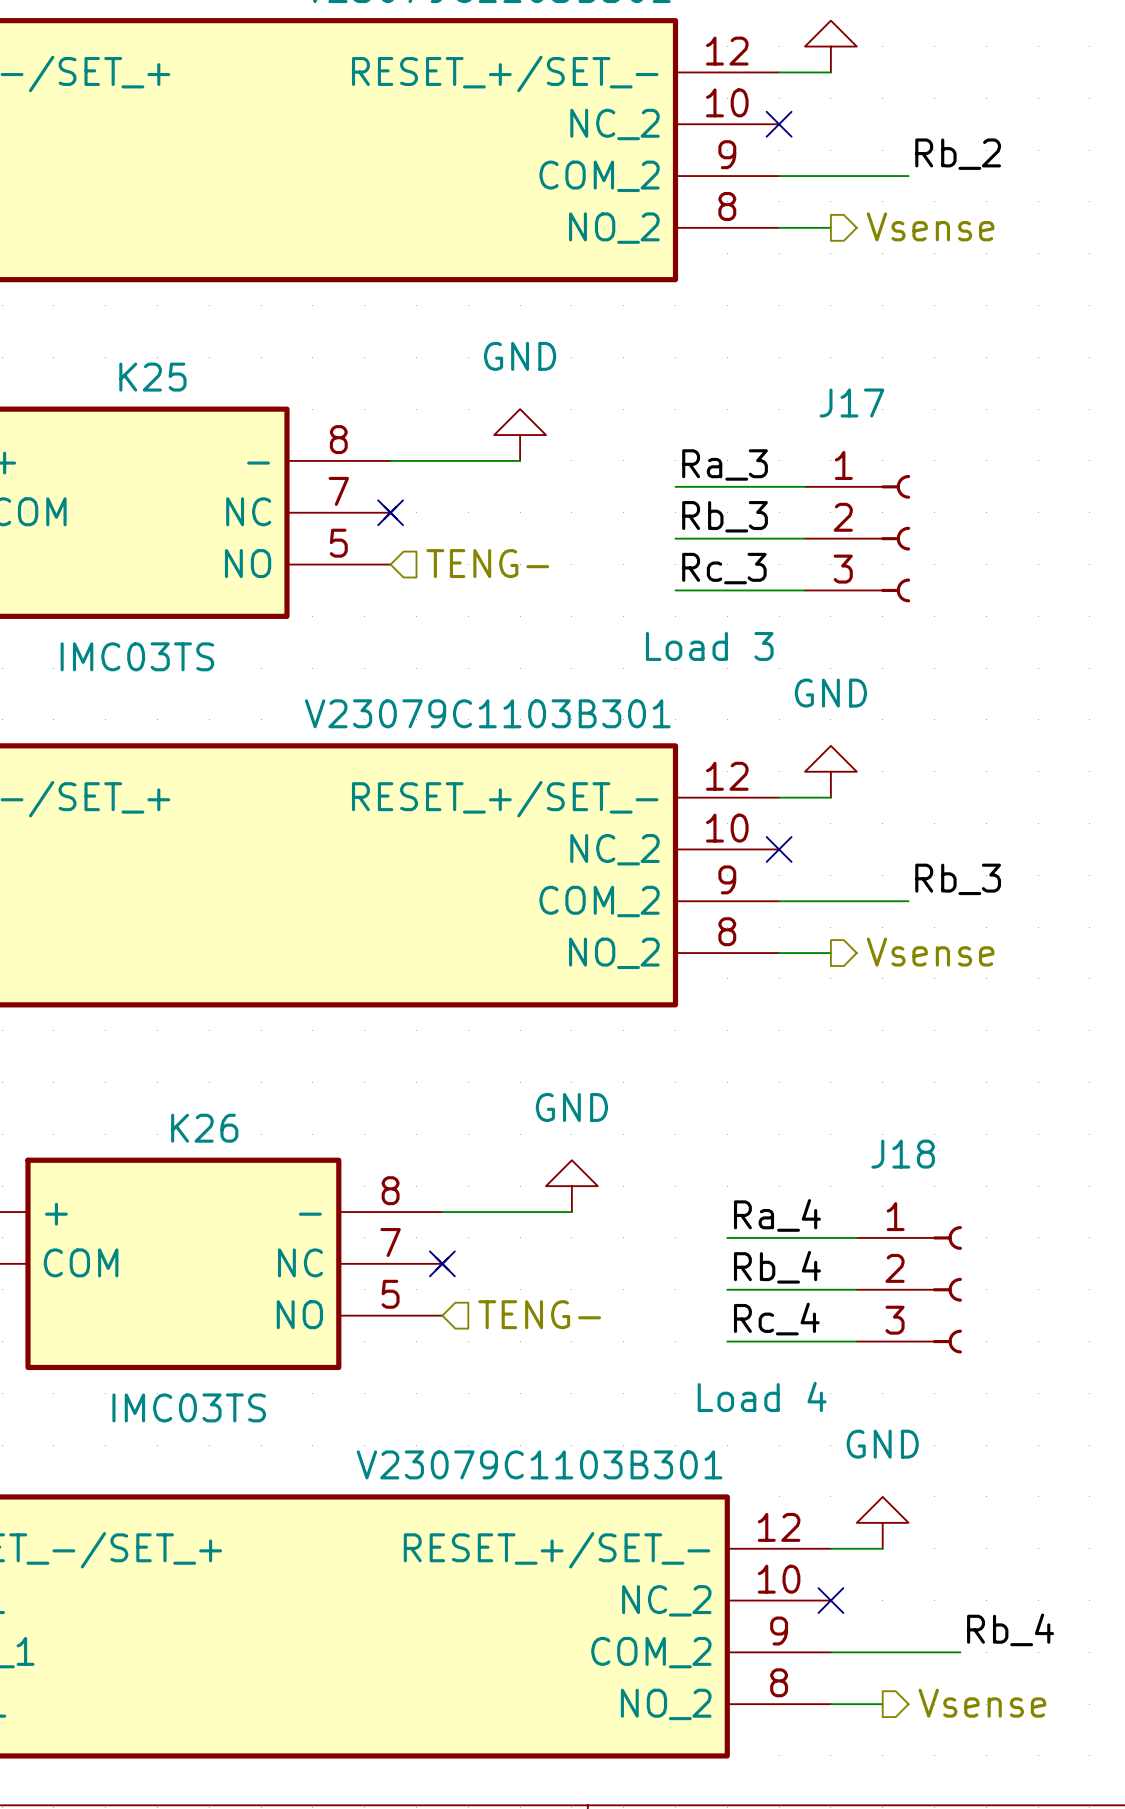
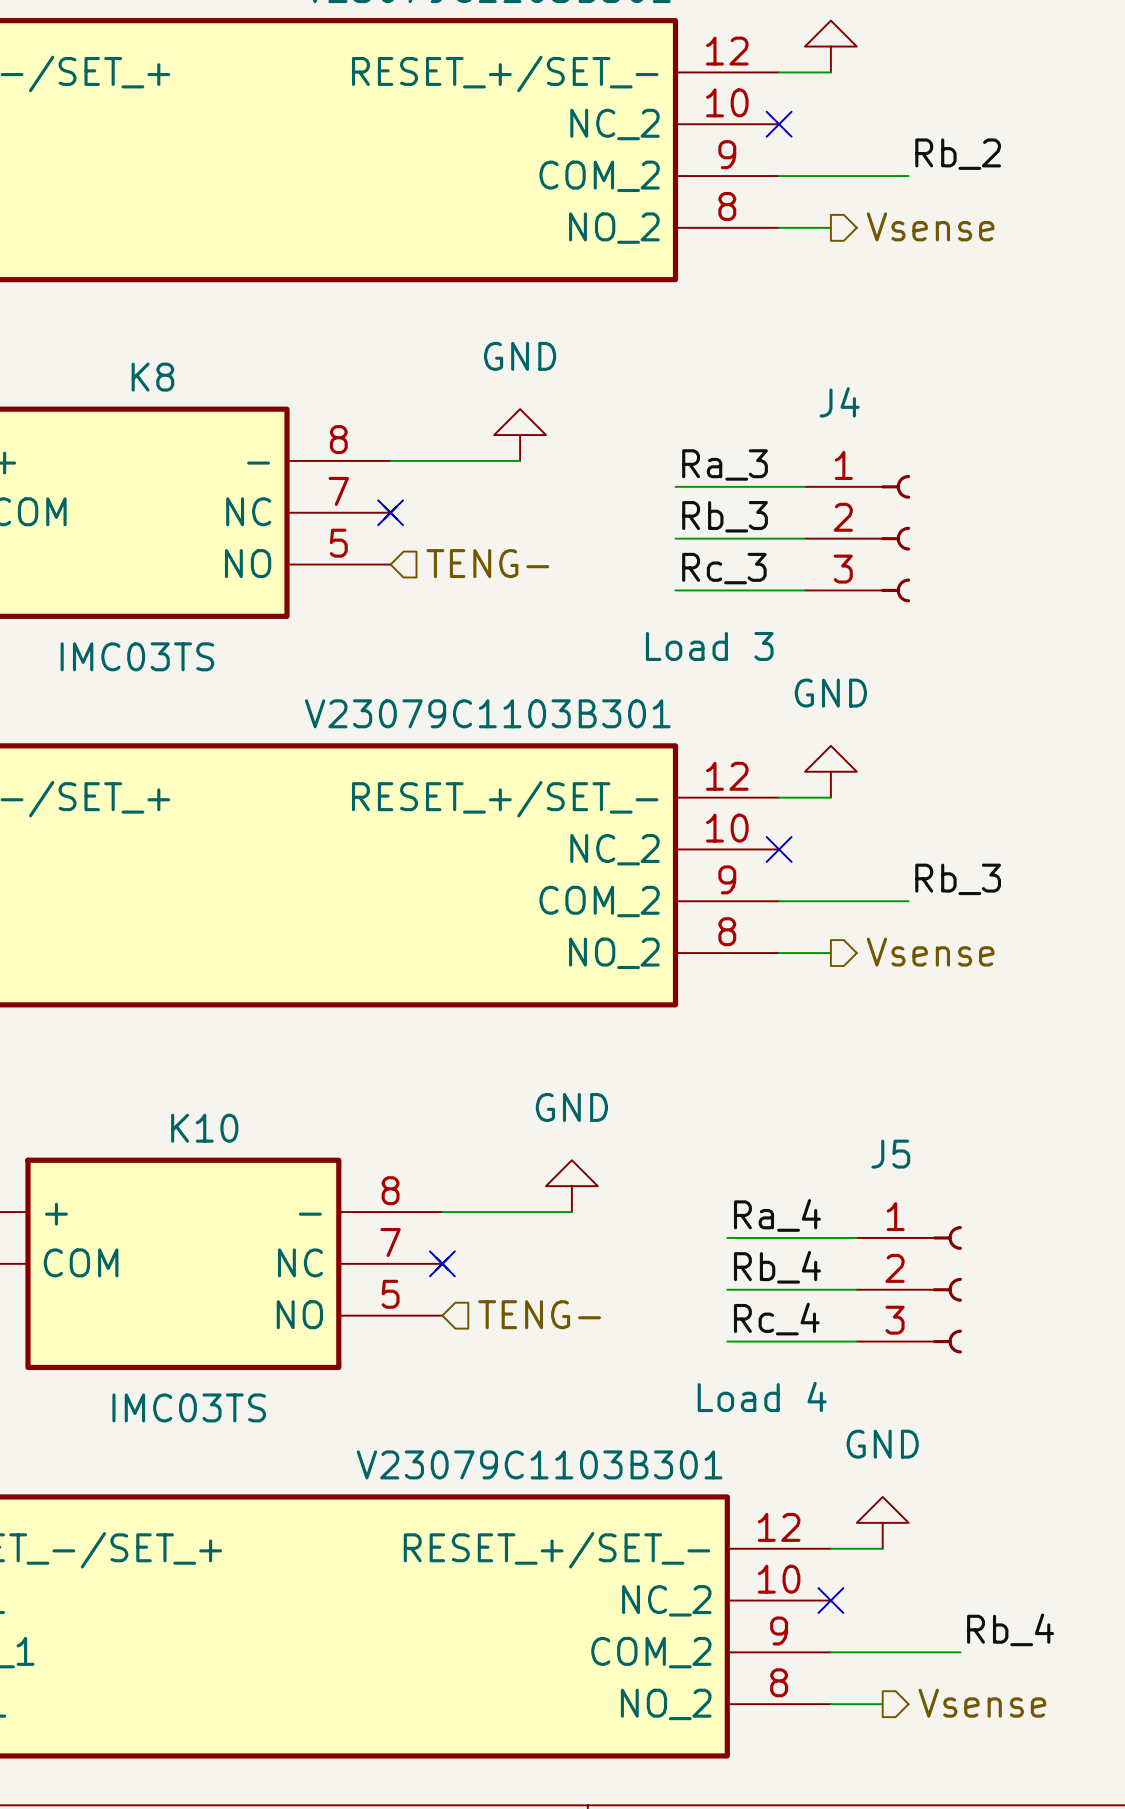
K25 name: K25 (152, 377) -> K8 (152, 377)
J17 name: J17 (851, 403) -> J4 (839, 402)
K26 name: K26 (204, 1128) -> K10 (204, 1128)
J18 name: J18 (903, 1154) -> J5 (890, 1154)

